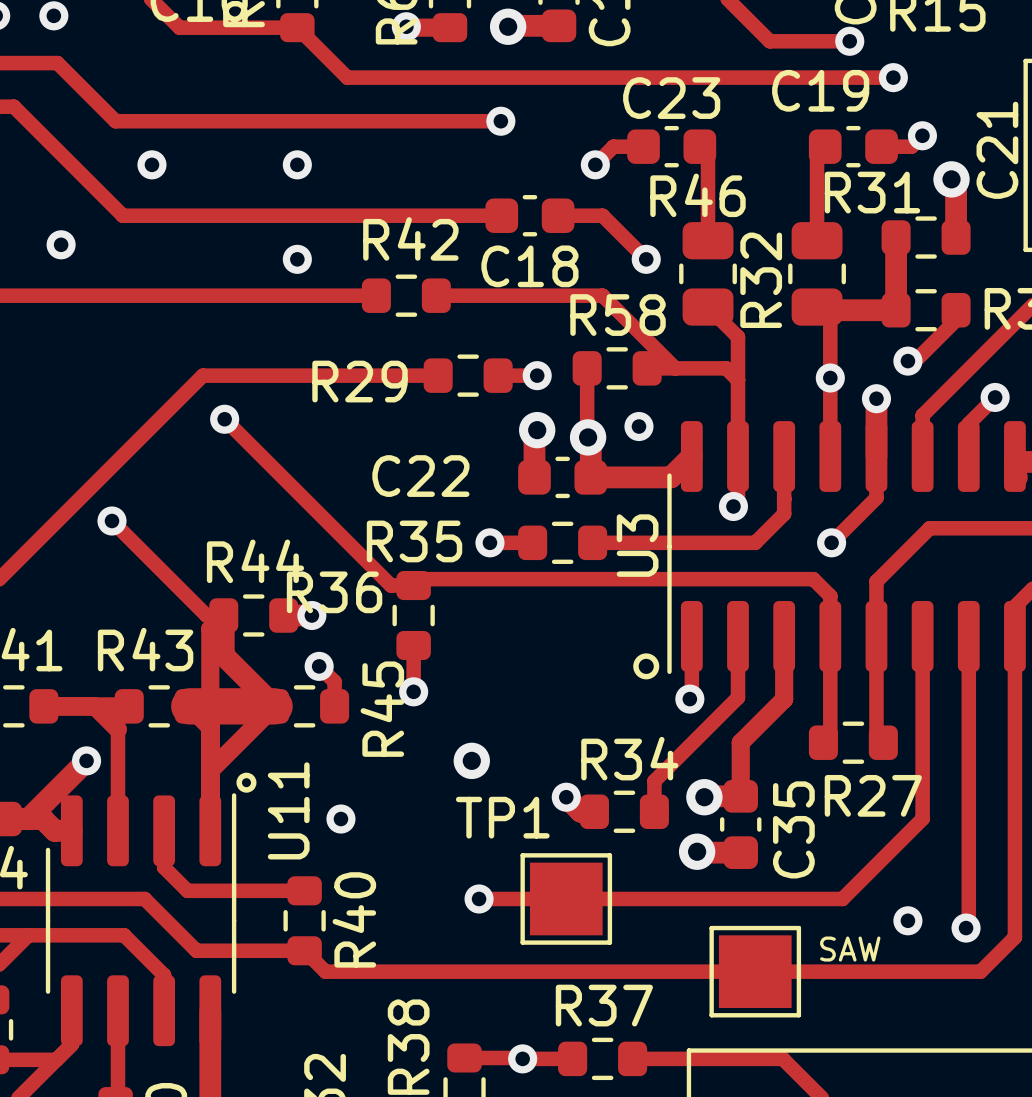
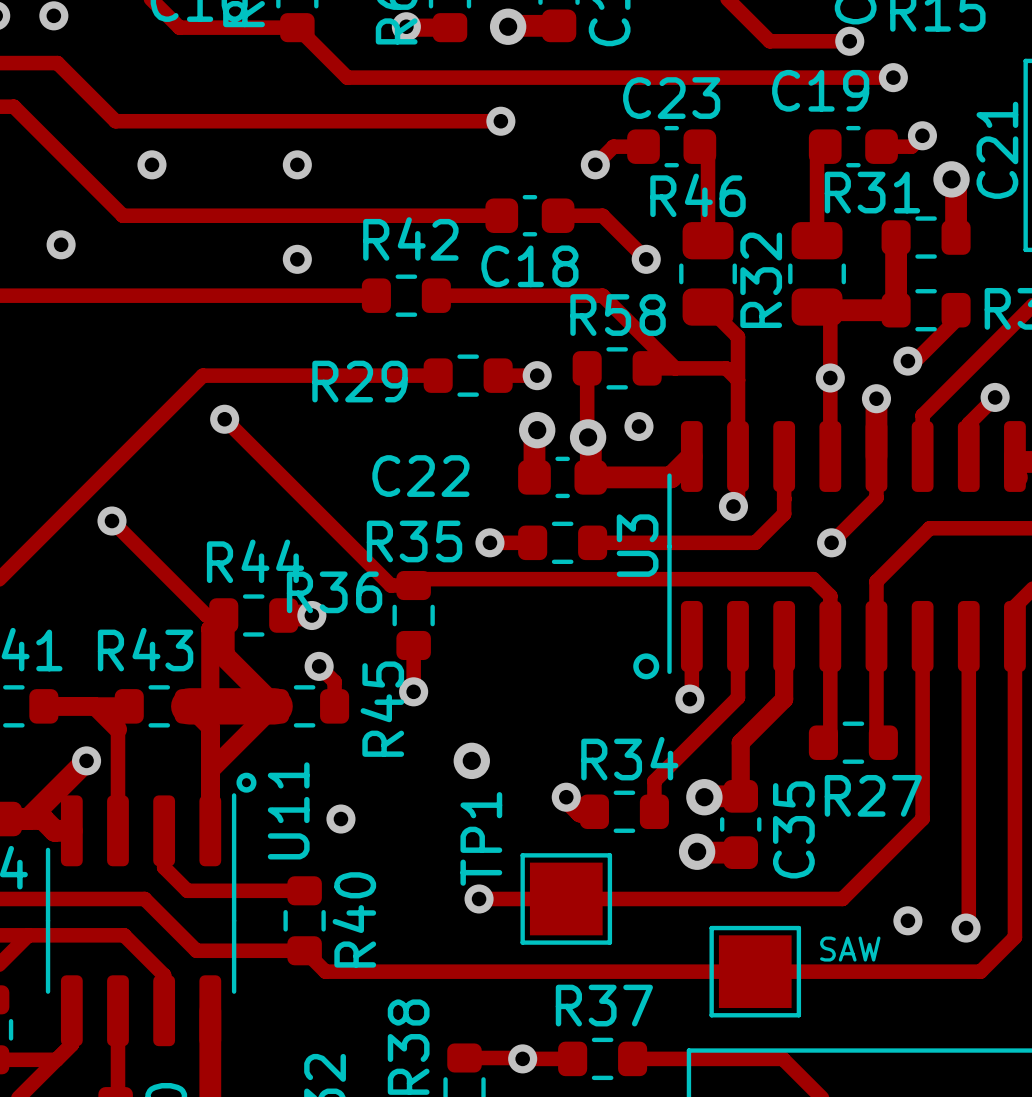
TP1 name rotation: 0° (502, 817) -> 90° counterclockwise (481, 838)

